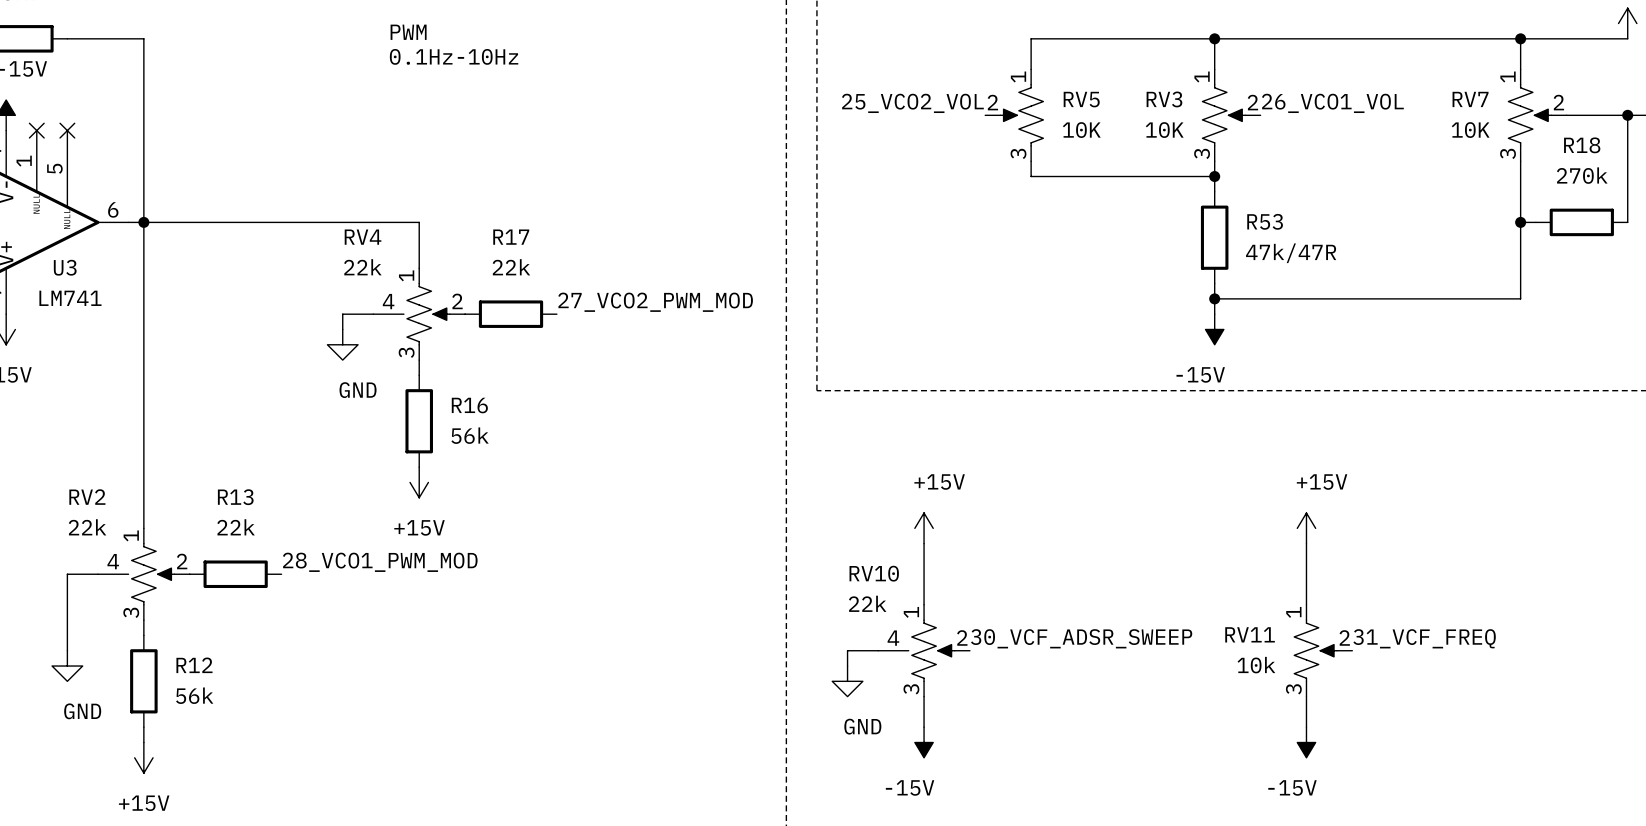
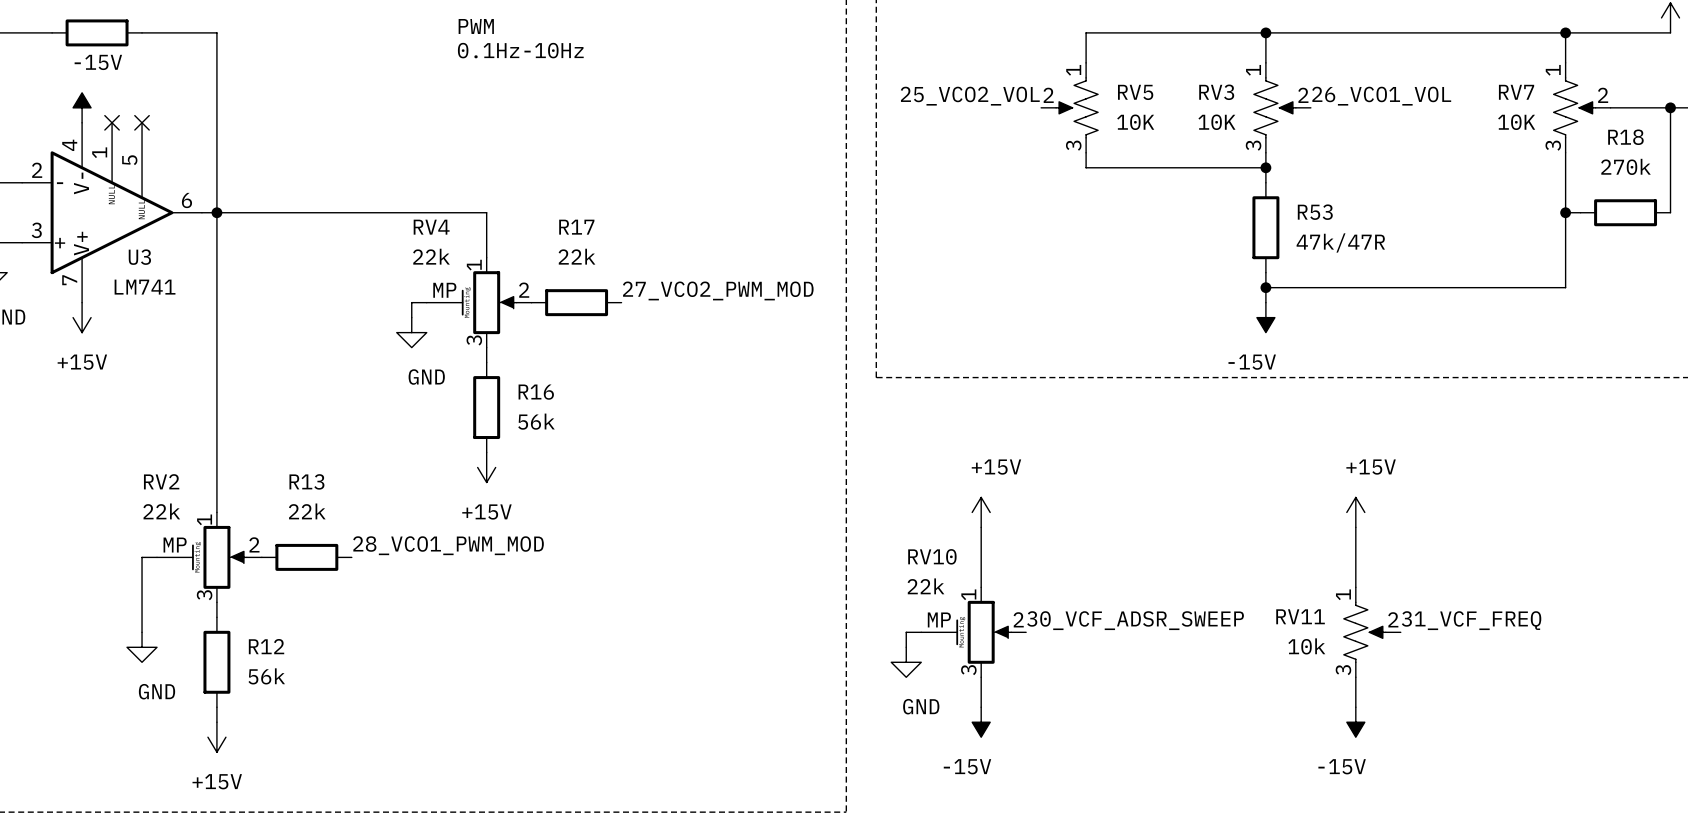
RV4 symbol: [373, 268, 466, 361] -> [426, 257, 532, 348]
RV2 symbol: [97, 528, 190, 621] -> [157, 512, 262, 603]
RV10 symbol: [878, 604, 970, 697] -> [921, 587, 1027, 678]

